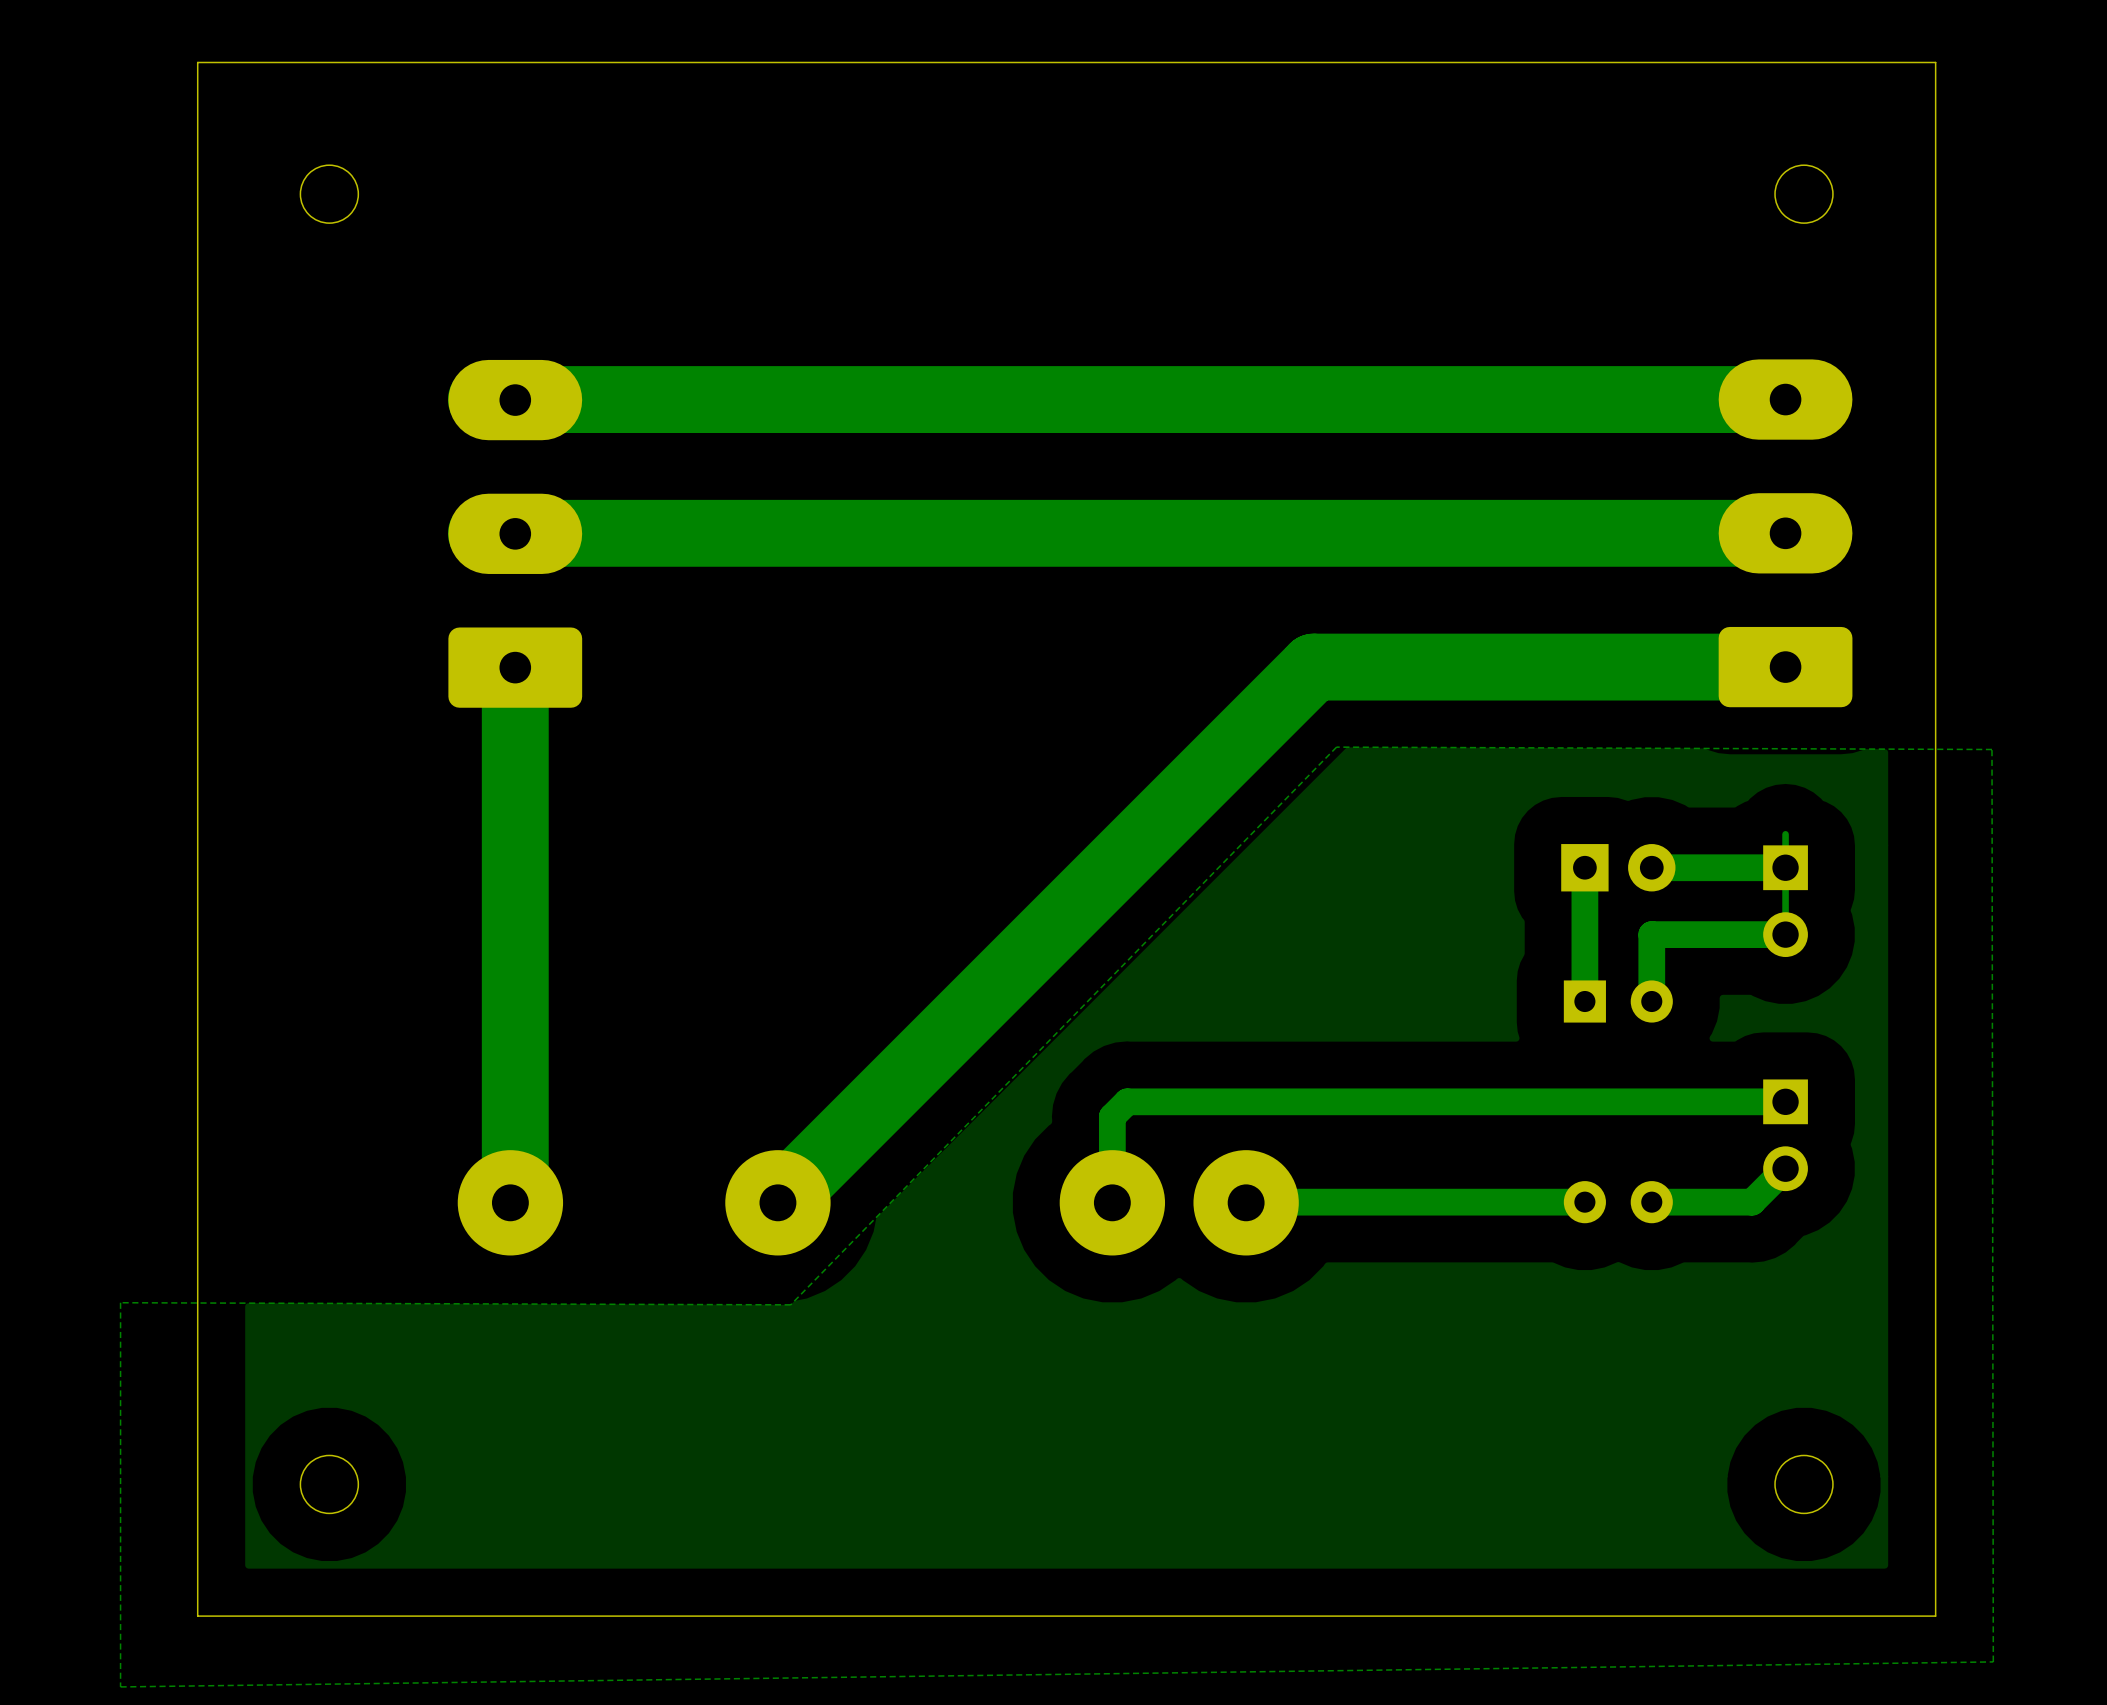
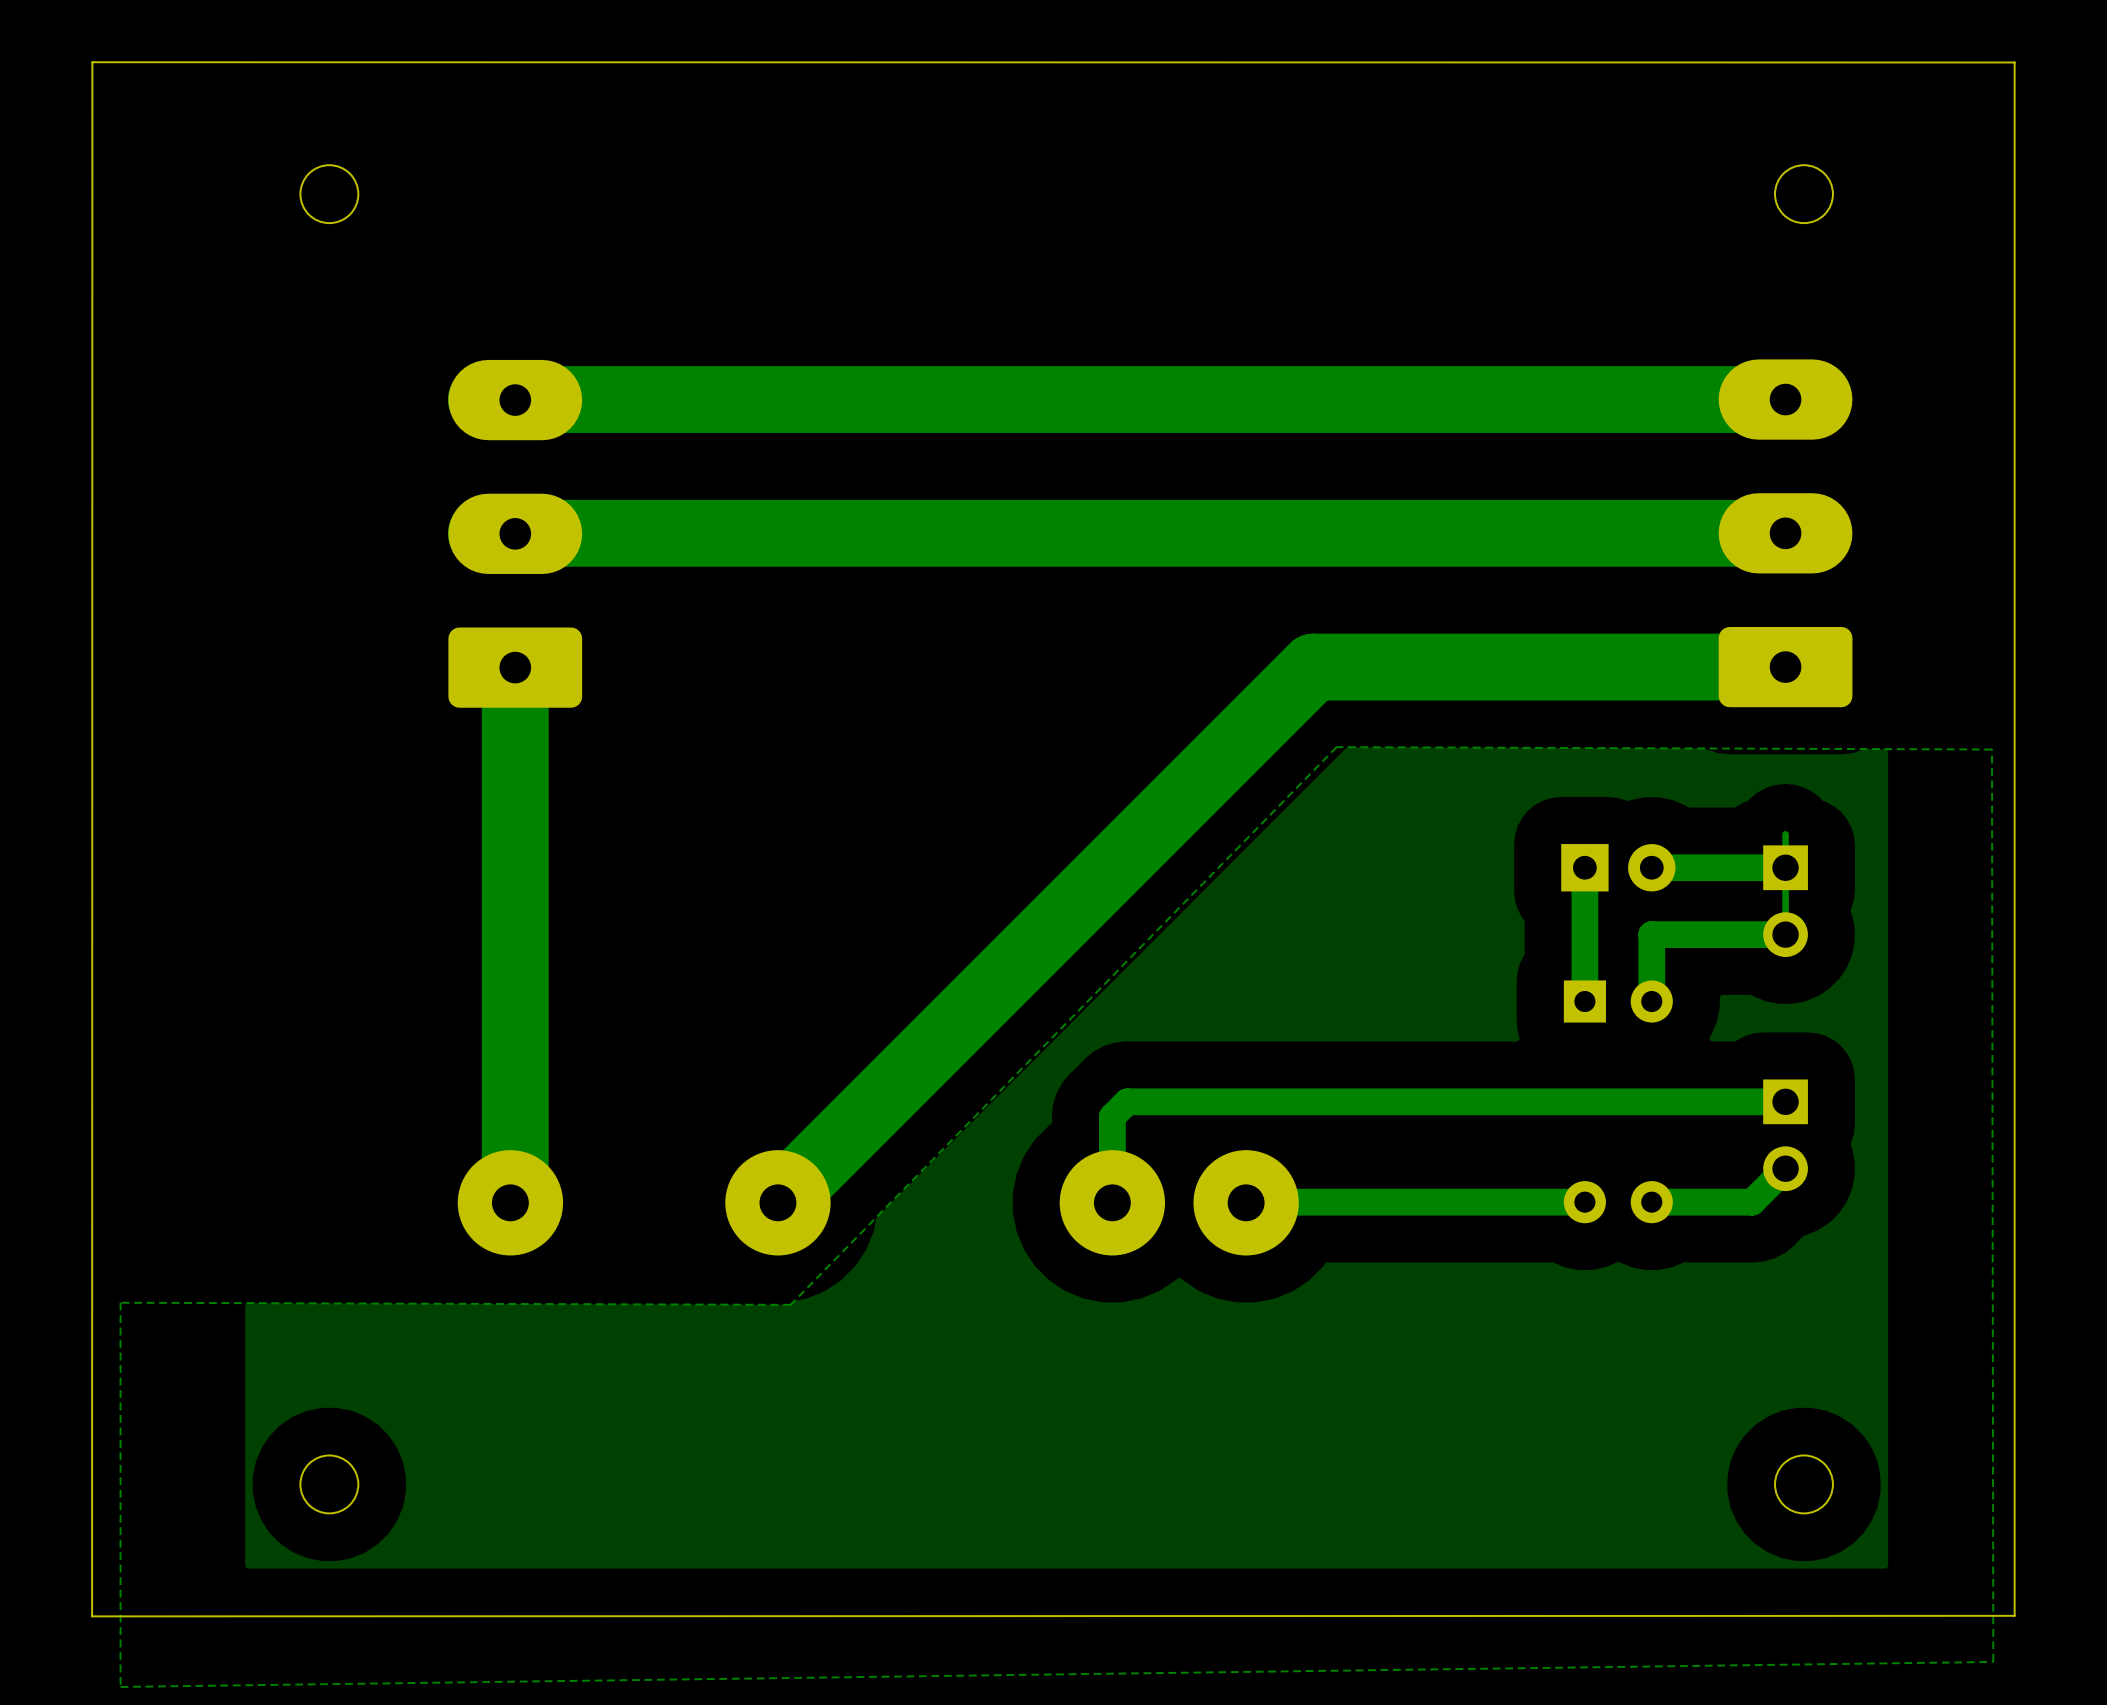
board edge: (1935, 62) (1935, 1616) (197, 1616) (197, 62) (1935, 62) -> (92, 62) (2014, 62) (2014, 1615) (92, 1616) (92, 62)

